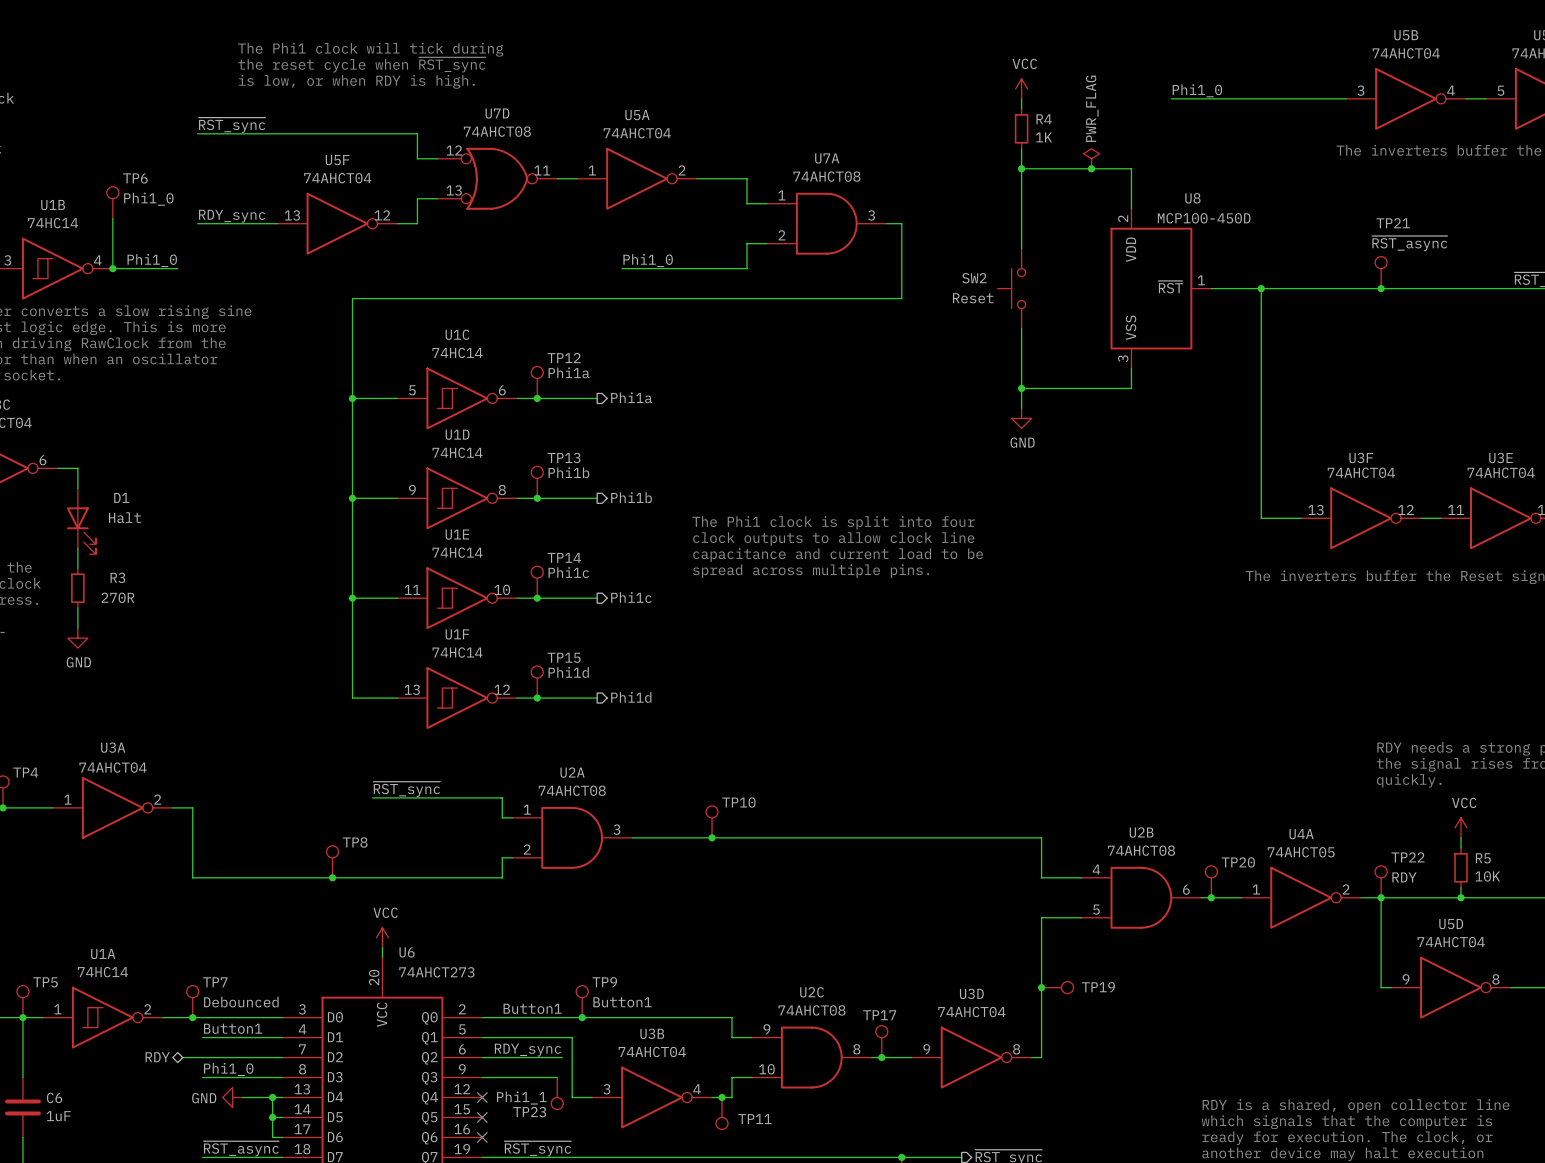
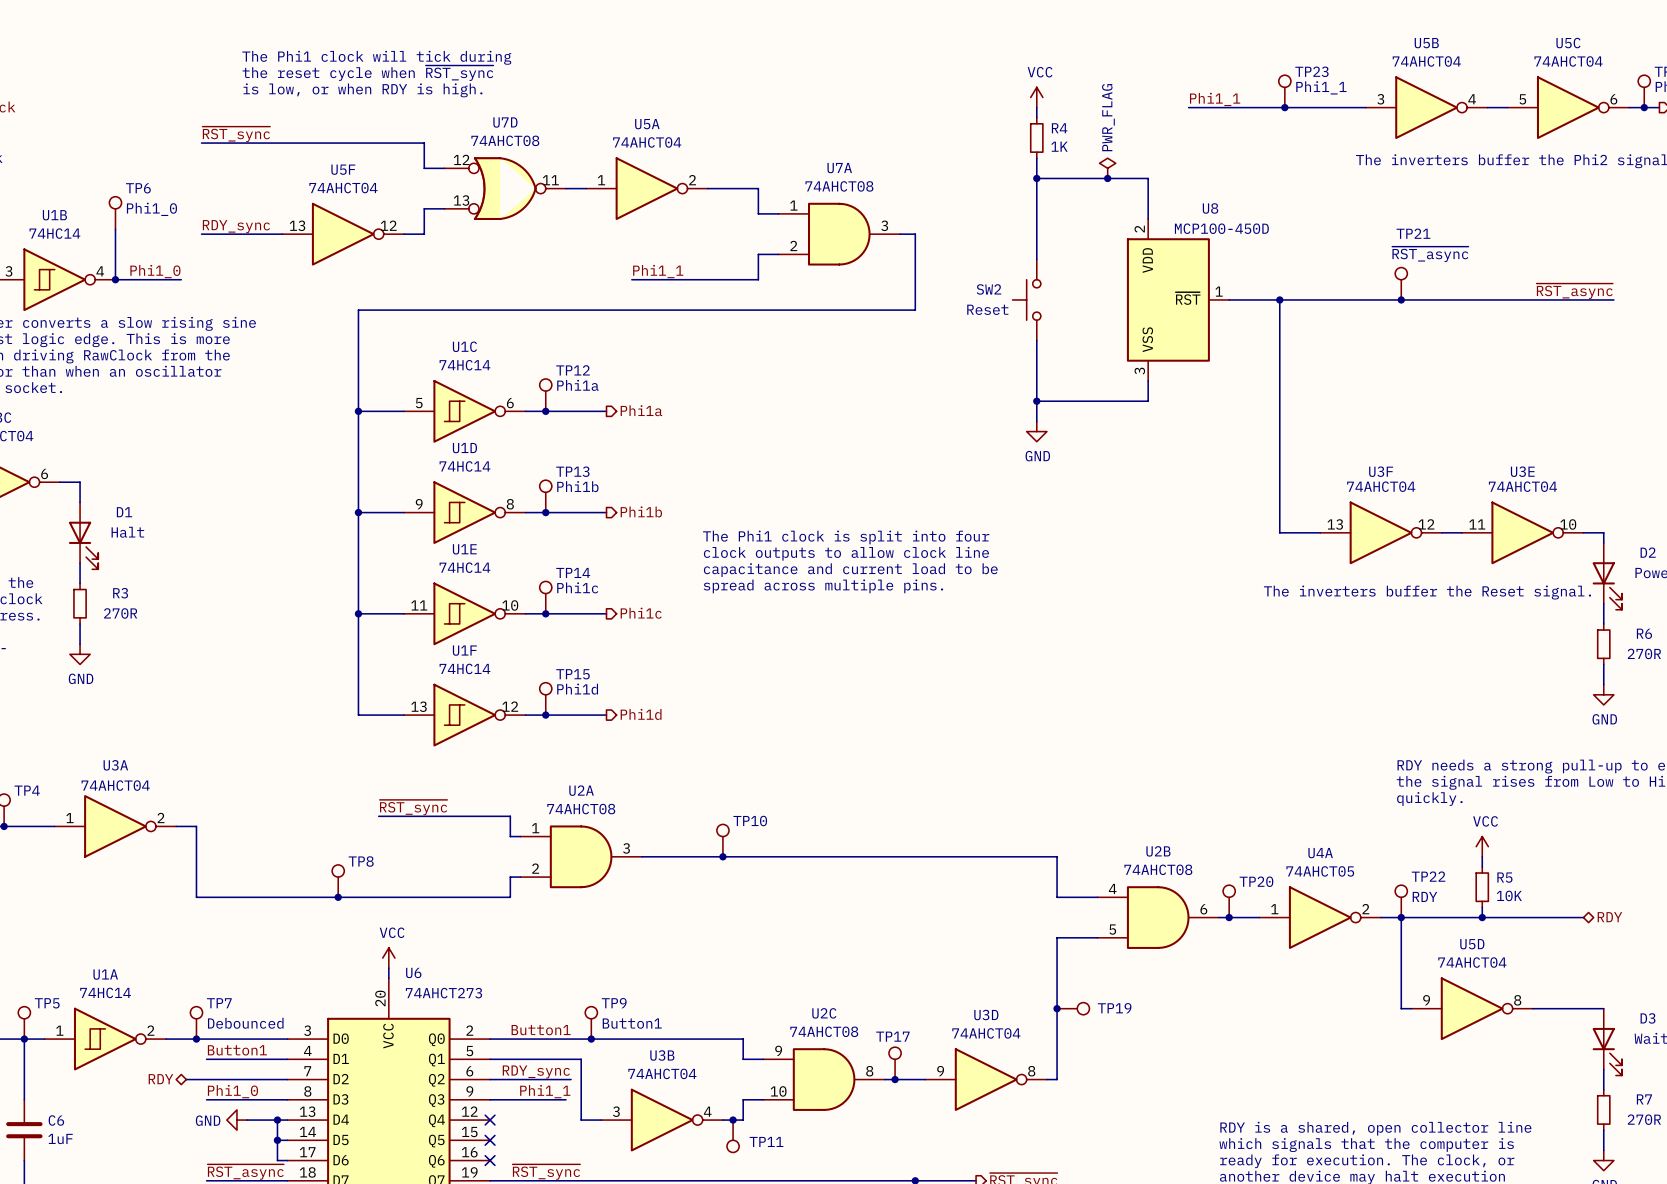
label: Phi1_0 (1197, 90) -> Phi1_1 (1215, 99)
junction: none -> (1284, 107)
label: Phi1_0 (648, 260) -> Phi1_1 (658, 271)
label: none -> Phi1_1 (545, 1091)
TP23 position: (557, 1093) -> (1284, 91)
TP23 rotation: 0° (557, 1103) -> 180° (1284, 81)

